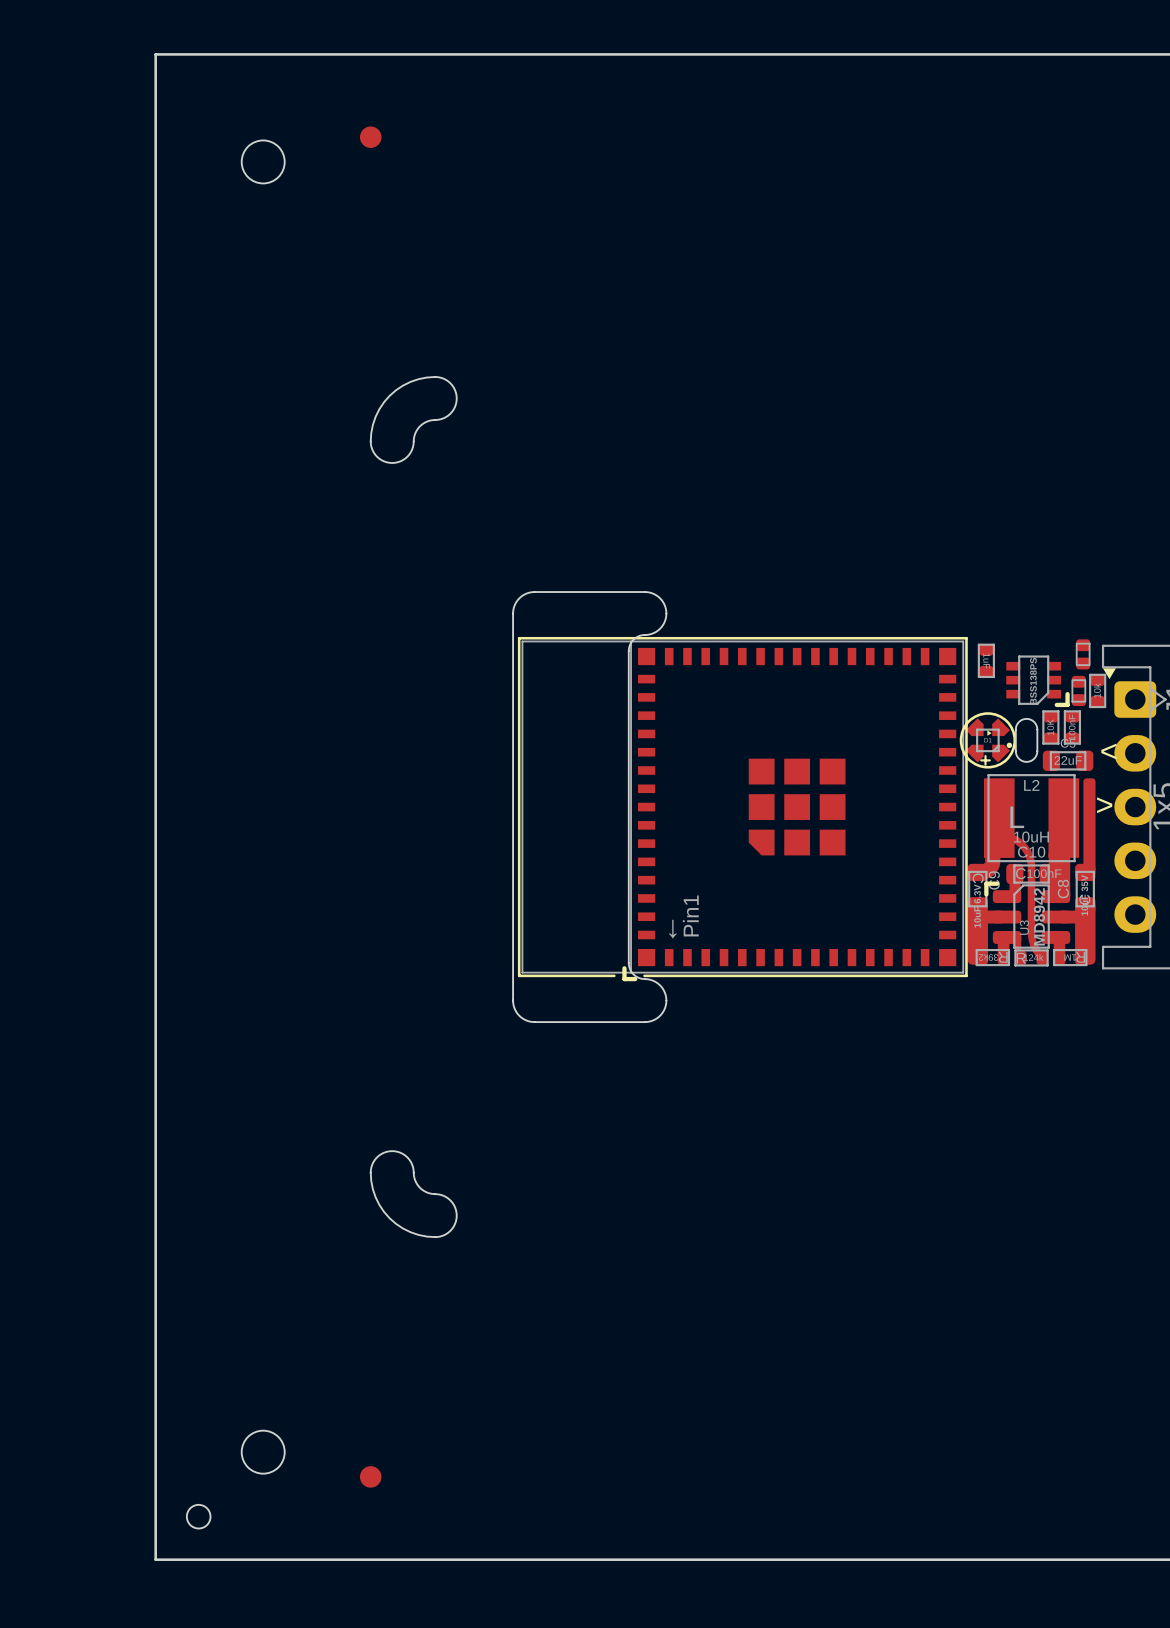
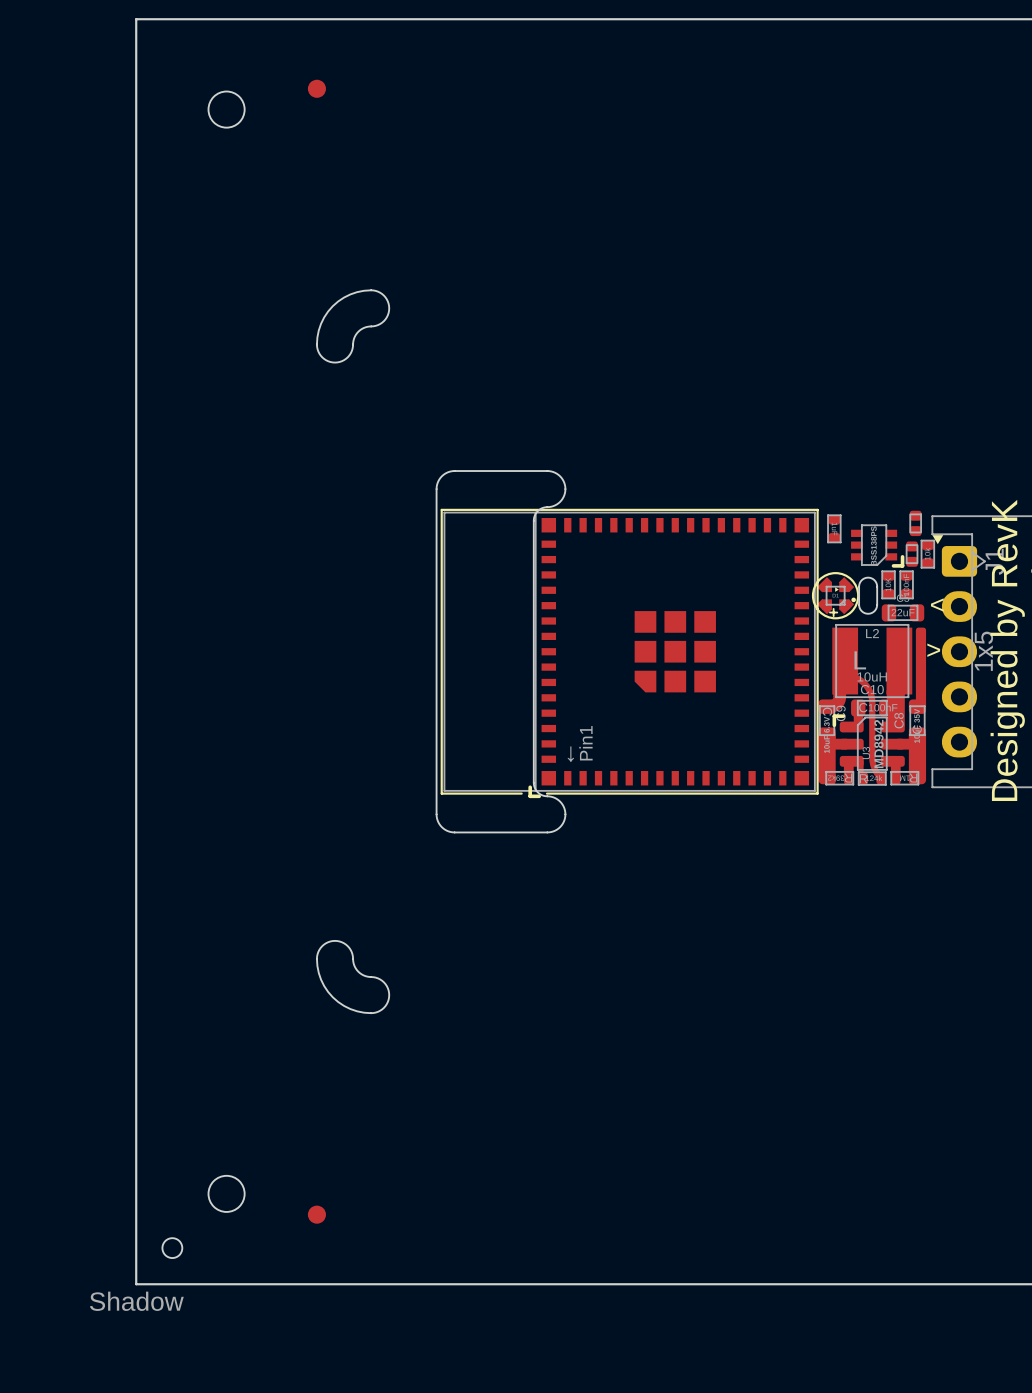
drawing: none -> [89, 1291, 184, 1311]

